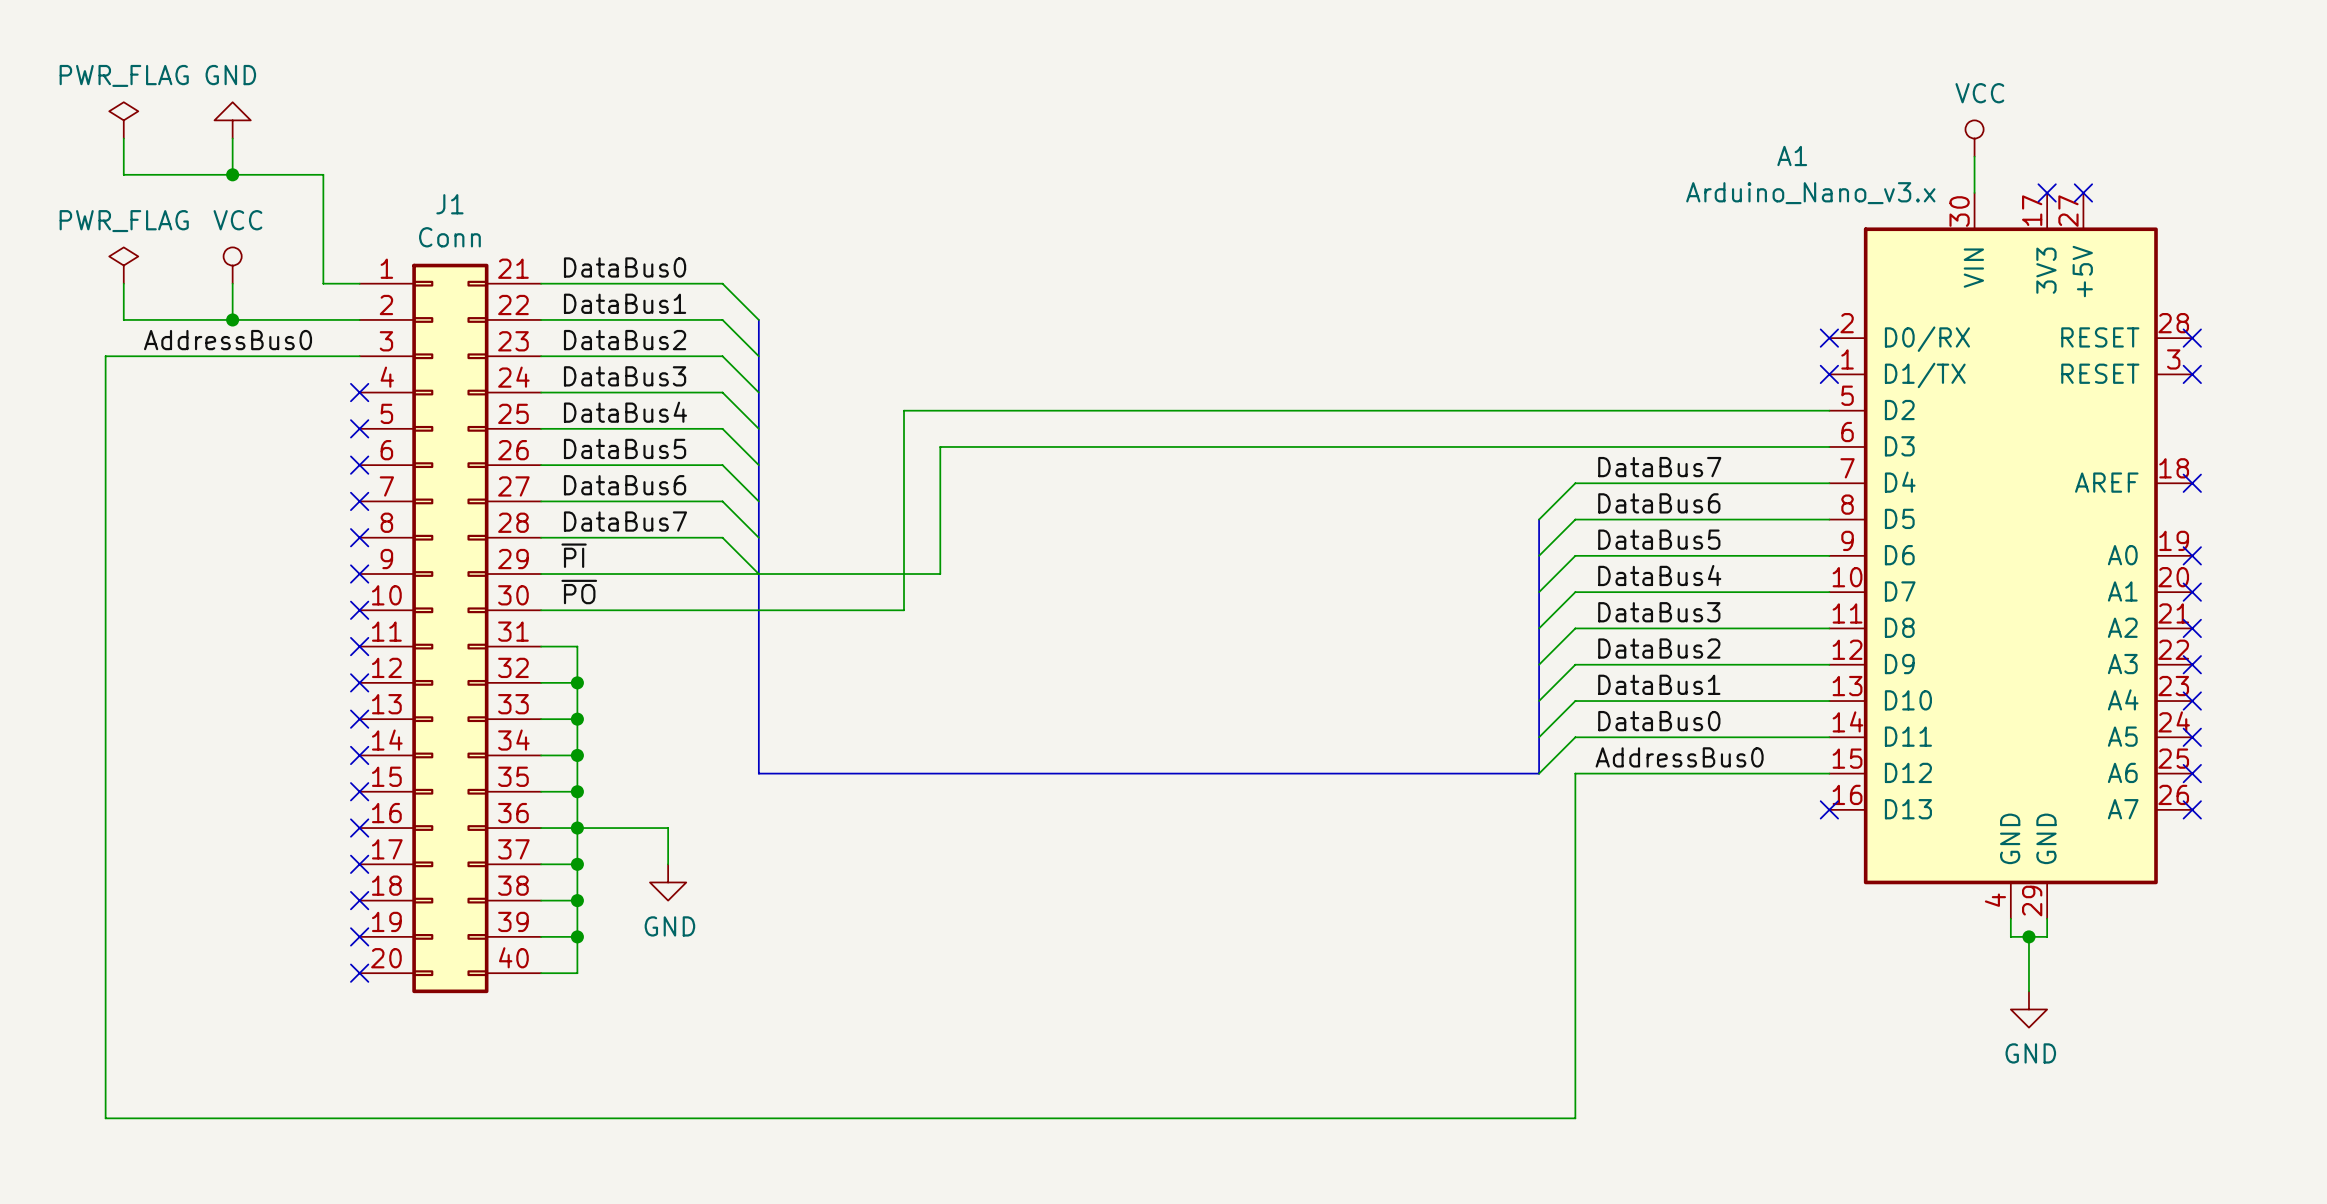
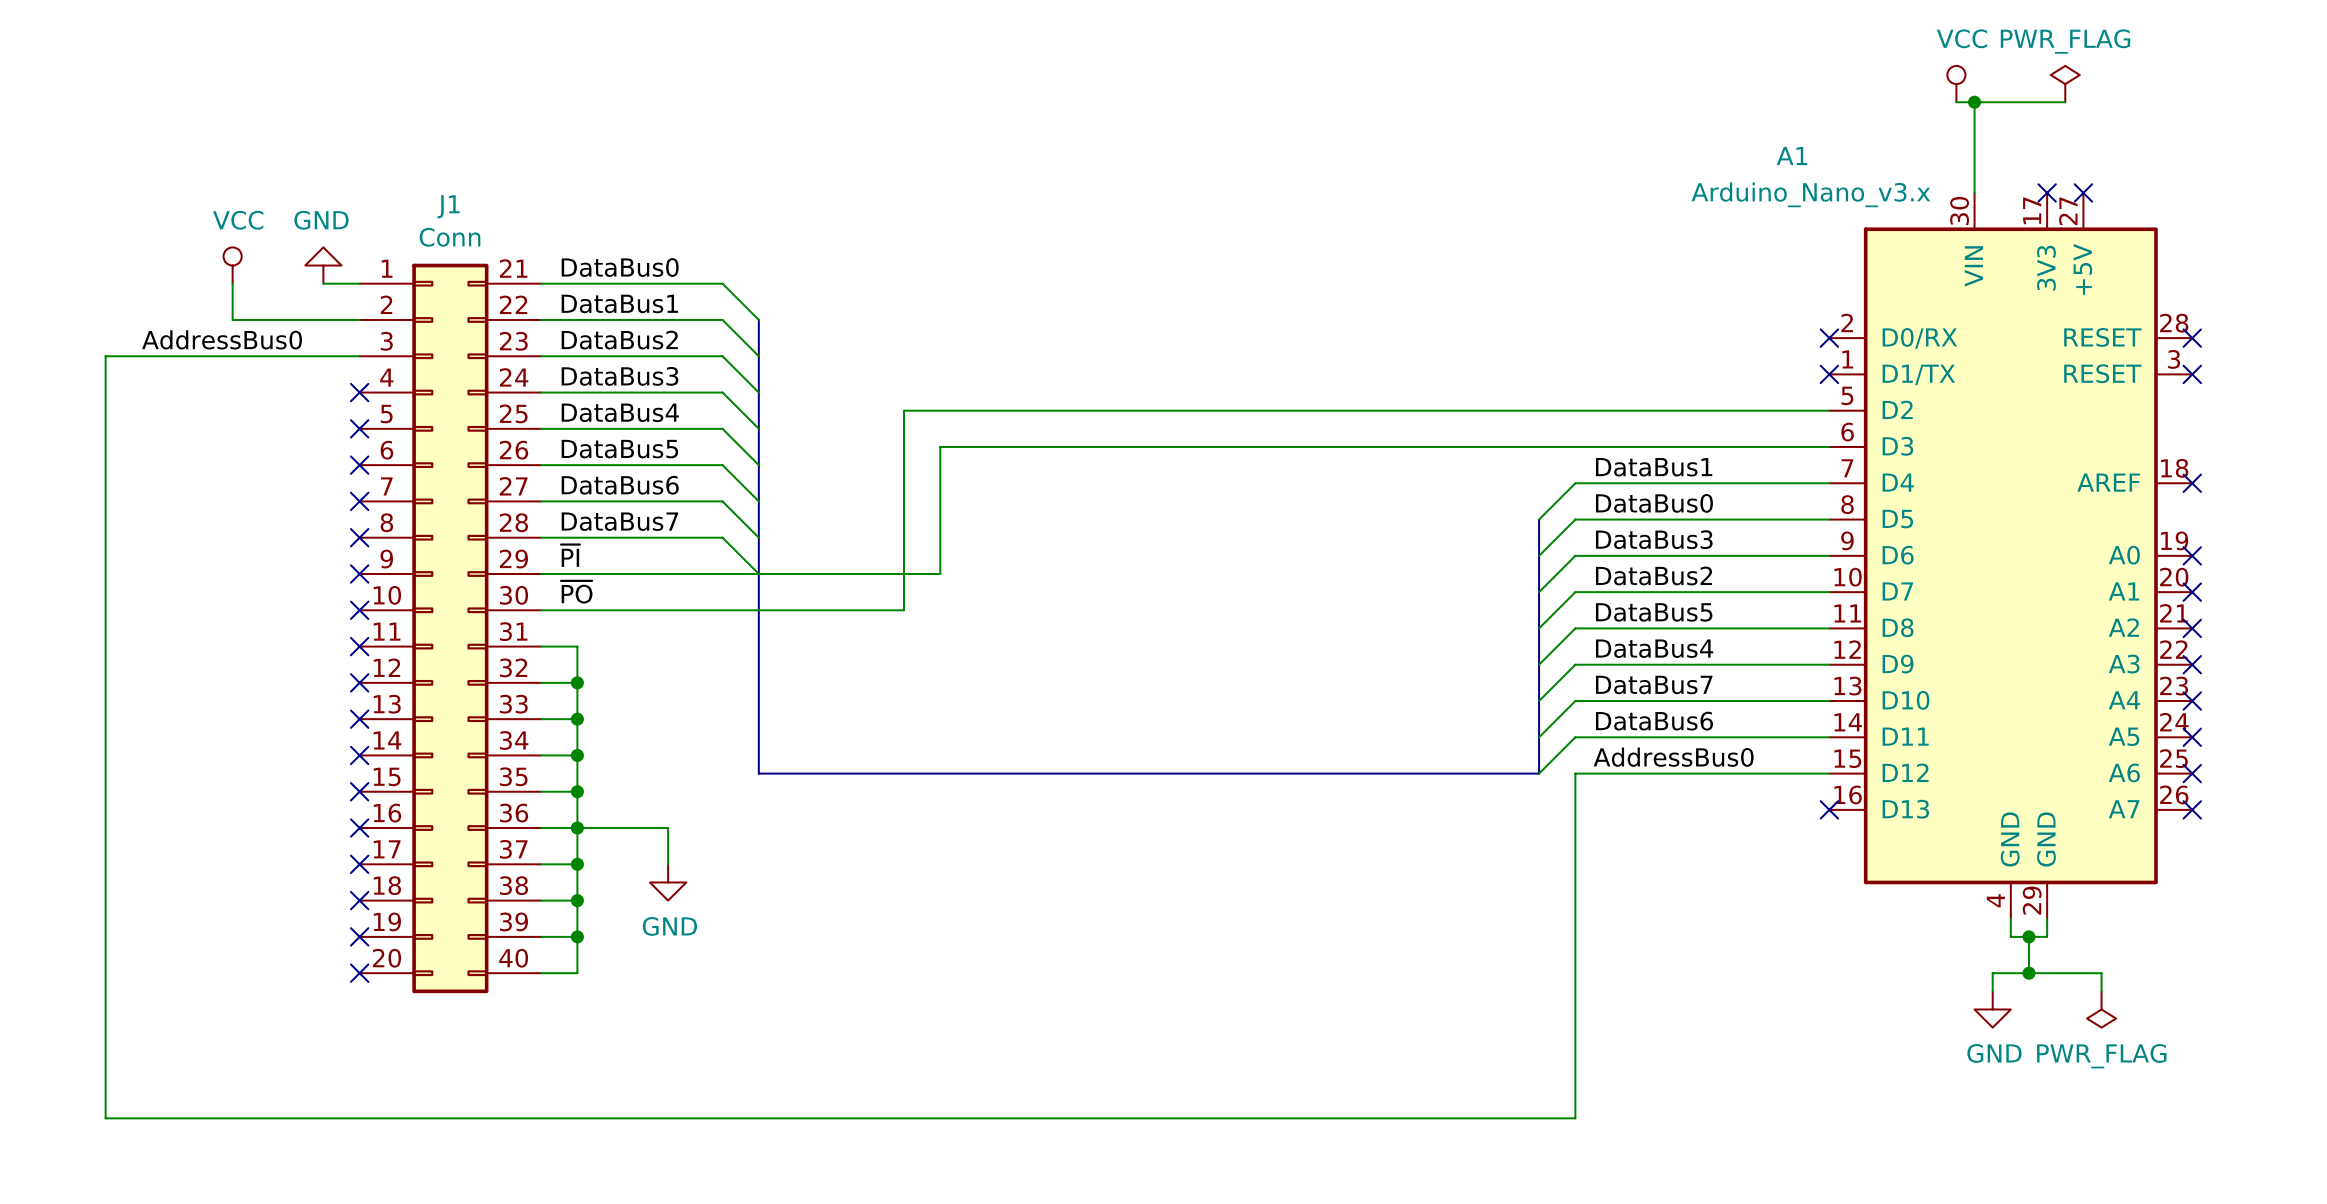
power symbol: none -> PWR_FLAG (2065, 84)
wire: none -> (1956, 102) (2065, 102)
wire: none -> (1974, 102) (1974, 156)
junction: none -> (1974, 102)
power symbol: PWR_FLAG (123, 120) -> none
power symbol position: GND (232, 120) -> GND (323, 265)
wire: (123, 138) (123, 174) (323, 174) (323, 283) -> none
wire: (232, 138) (232, 174) -> none
power symbol position: VCC (1974, 138) -> VCC (1956, 84)
junction: (232, 174) -> none
power symbol: PWR_FLAG (123, 265) -> none
wire: (123, 283) (123, 319) (232, 319) -> none
junction: (232, 319) -> none
label: DataBus7 (1659, 467) -> DataBus1 (1654, 467)
label: DataBus6 (1659, 503) -> DataBus0 (1654, 503)
label: DataBus5 (1659, 539) -> DataBus3 (1654, 539)
label: DataBus4 (1659, 575) -> DataBus2 (1654, 575)
label: DataBus3 (1659, 612) -> DataBus5 (1654, 612)
label: DataBus2 (1659, 648) -> DataBus4 (1654, 648)
label: DataBus1 (1659, 684) -> DataBus7 (1654, 685)
label: DataBus0 (1659, 721) -> DataBus6 (1654, 721)
wire: (2028, 973) (2028, 991) -> none
junction: none -> (2028, 973)
wire: none -> (1992, 991) (1992, 973) (2101, 973) (2101, 991)
power symbol position: GND (2028, 1009) -> GND (1992, 1009)
power symbol: none -> PWR_FLAG (2101, 1009)

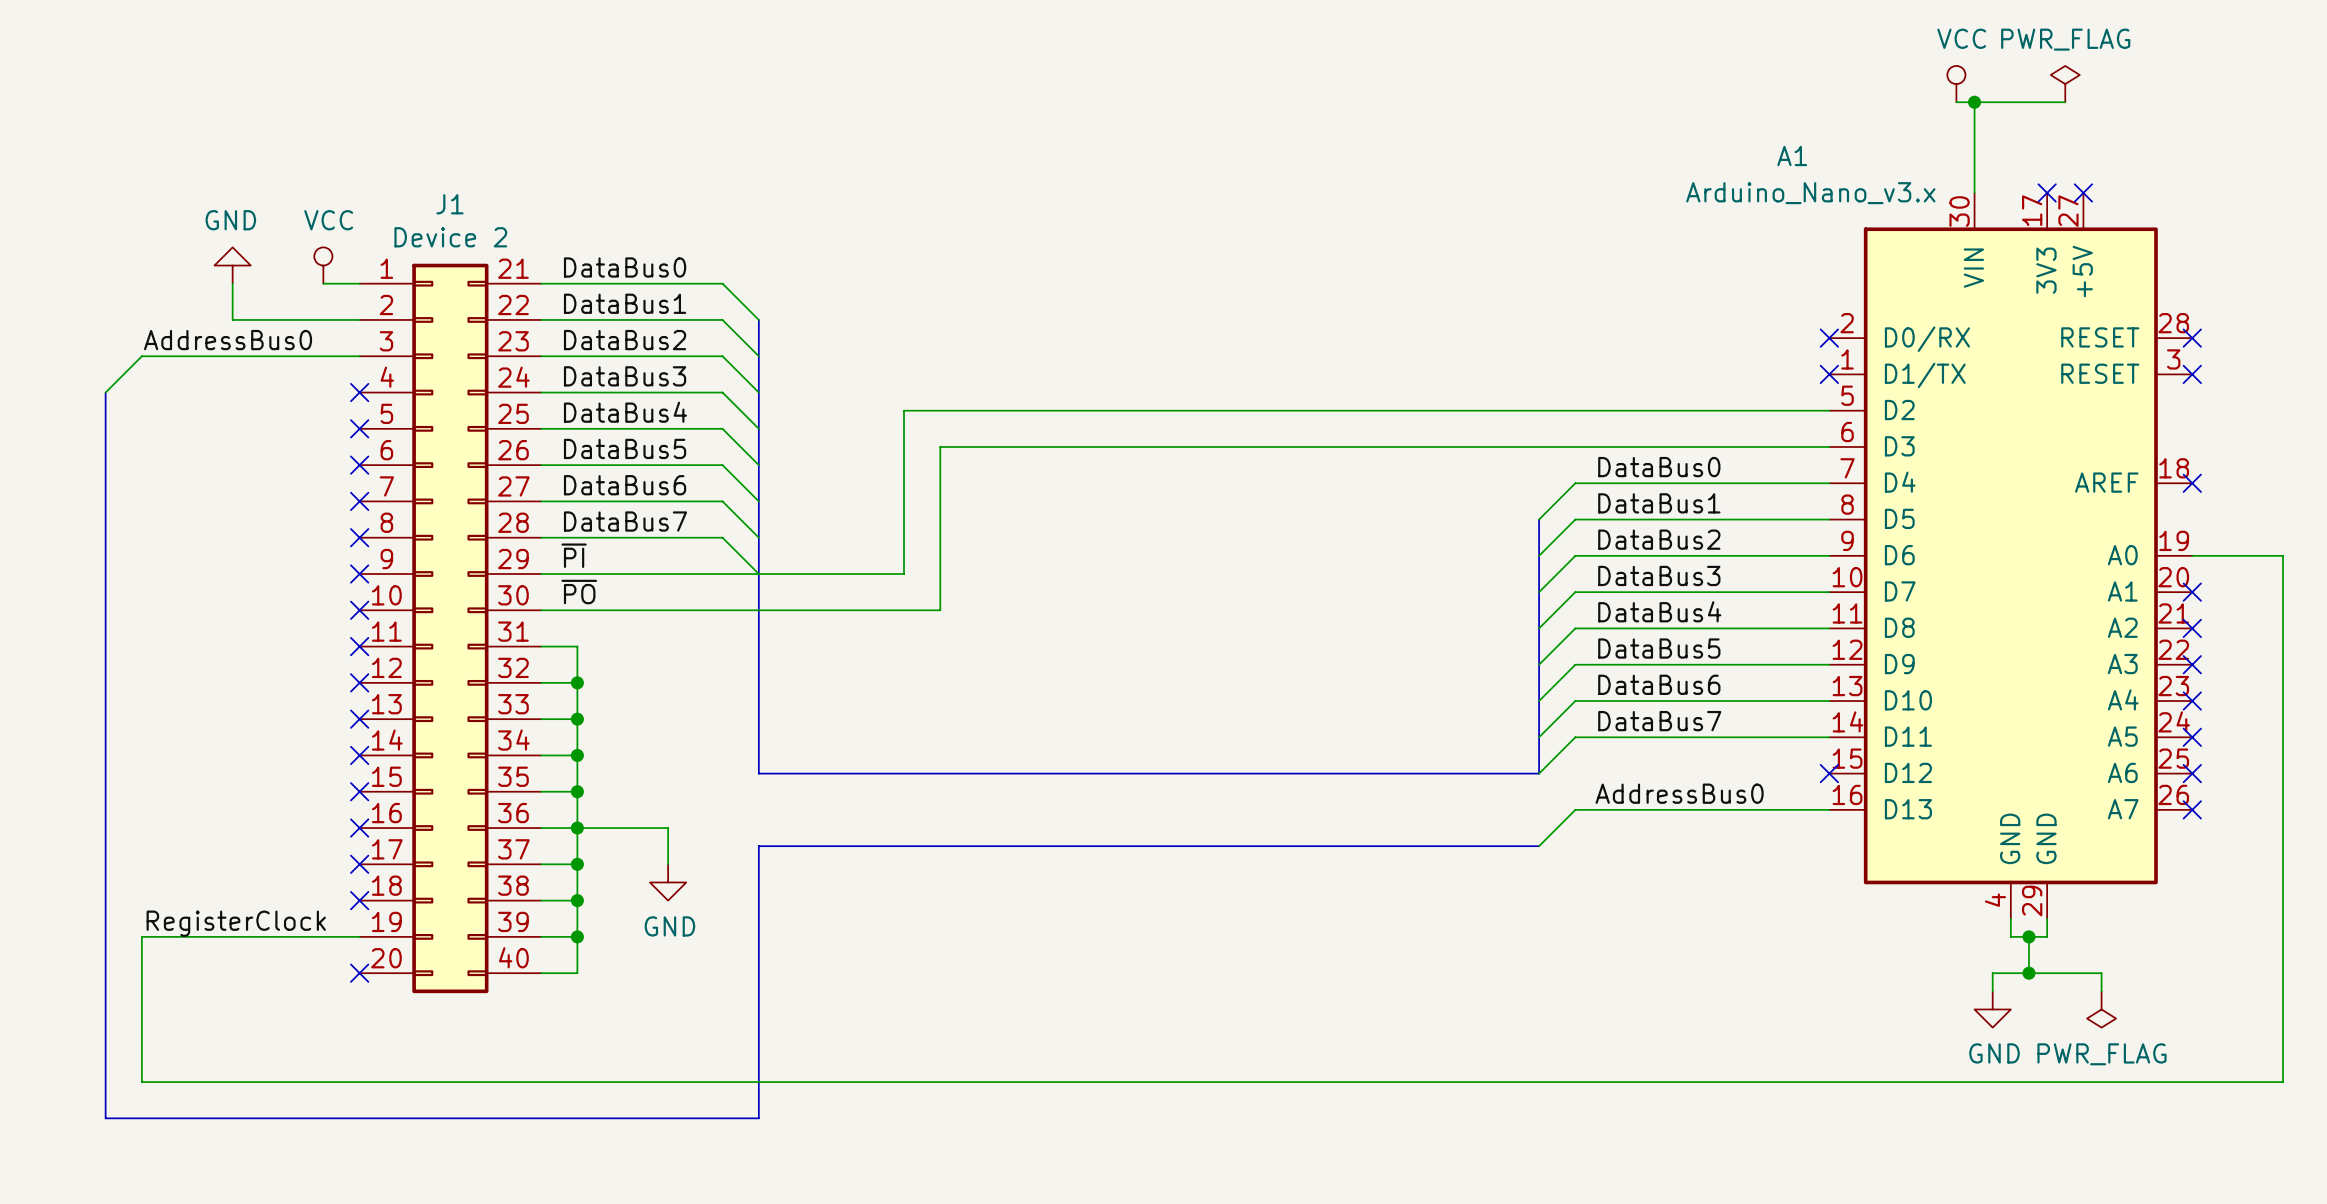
J1 value: Conn (450, 237) -> Device 2 (450, 237)
power symbol: VCC (232, 265) -> GND (232, 265)
power symbol: GND (323, 265) -> VCC (323, 265)
wire: (141, 356) (105, 356) (105, 1118) (1575, 1118) (1575, 773) (1829, 773) -> (141, 356) (105, 392)
bus: none -> (105, 392) (105, 1118) (758, 1118) (758, 846) (1539, 846)
label: DataBus1 (1654, 467) -> DataBus0 (1659, 467)
label: DataBus0 (1654, 503) -> DataBus1 (1659, 503)
label: DataBus3 (1654, 539) -> DataBus2 (1659, 539)
wire: none -> (2192, 555) (2283, 555) (2283, 1082) (141, 1082) (141, 936) (359, 936)
no-connect mark: (2192, 555) -> none
wire: (940, 574) (904, 574) (904, 610) -> (940, 574) (940, 610) (904, 610)
label: DataBus2 (1654, 575) -> DataBus3 (1659, 575)
label: DataBus5 (1654, 612) -> DataBus4 (1659, 611)
label: DataBus4 (1654, 648) -> DataBus5 (1659, 648)
label: DataBus7 (1654, 685) -> DataBus6 (1659, 684)
label: DataBus6 (1654, 721) -> DataBus7 (1659, 721)
label position: AddressBus0 (1673, 757) -> AddressBus0 (1679, 793)
wire: none -> (1829, 809) (1575, 809) (1539, 846)
no-connect mark position: (1829, 809) -> (1829, 773)
label: none -> RegisterClock (236, 923)
no-connect mark: (359, 936) -> none

